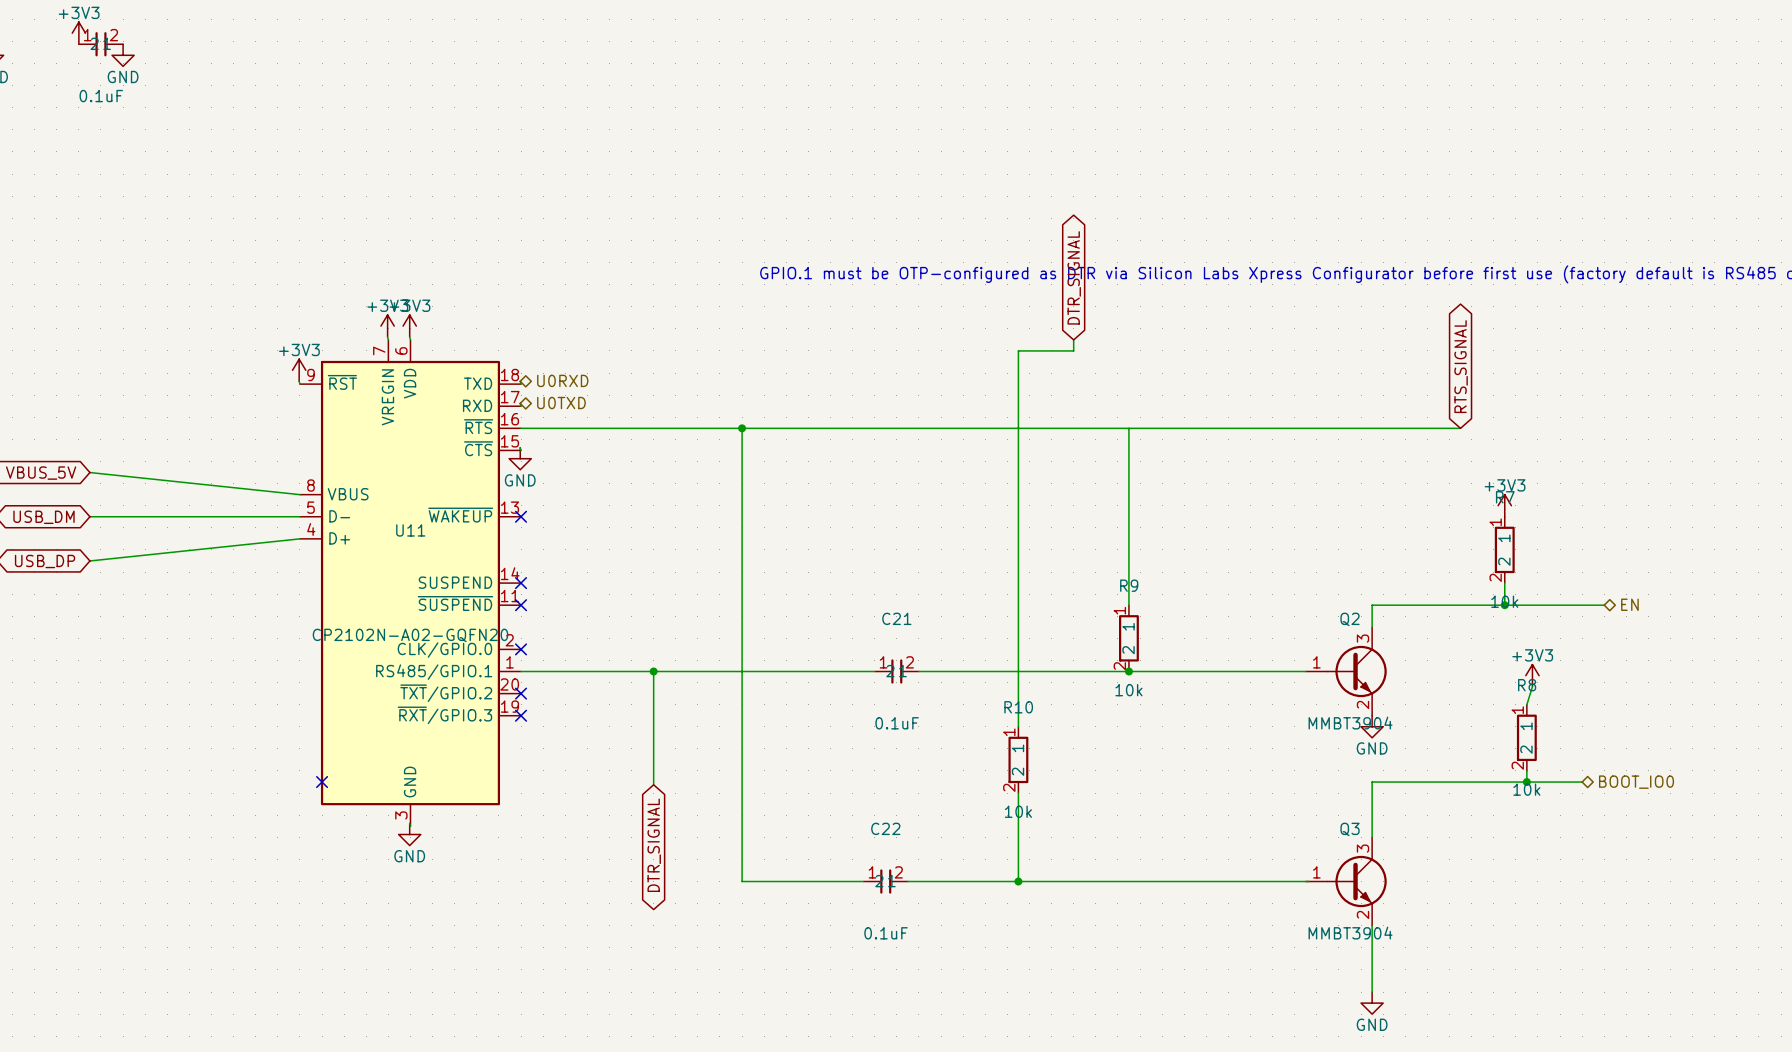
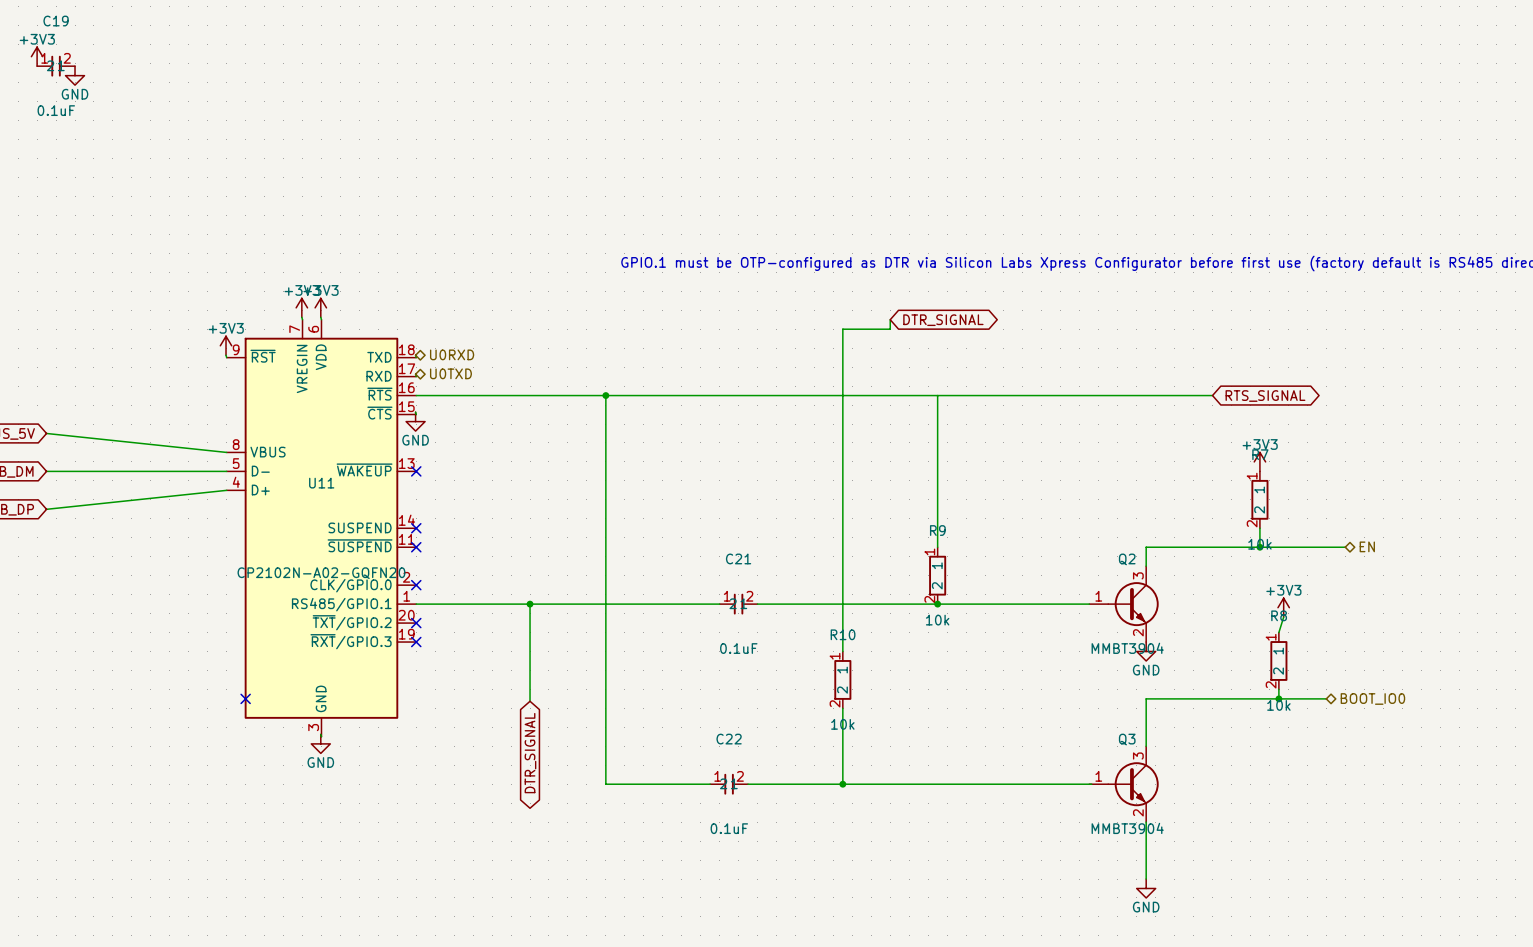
global label rotation: 0° (1074, 277) -> 90° clockwise (943, 320)
global label rotation: 0° (1461, 366) -> 90° clockwise (1265, 396)
wire: (1449, 428) (1460, 428) -> none

